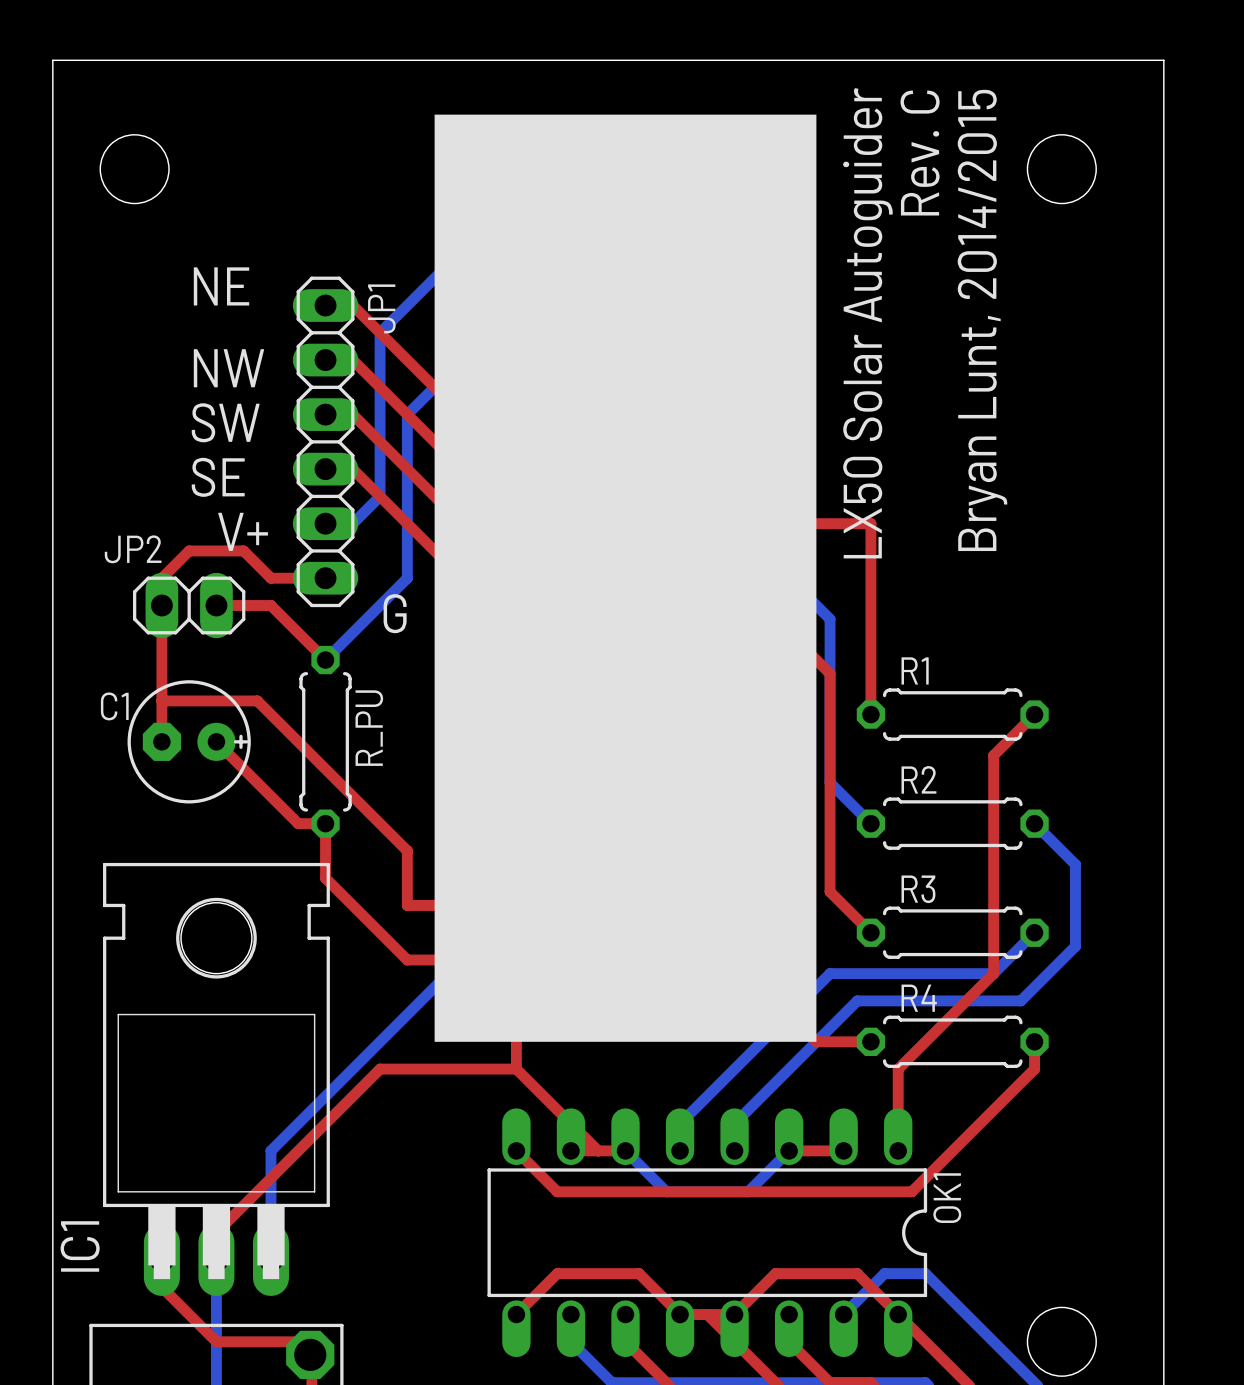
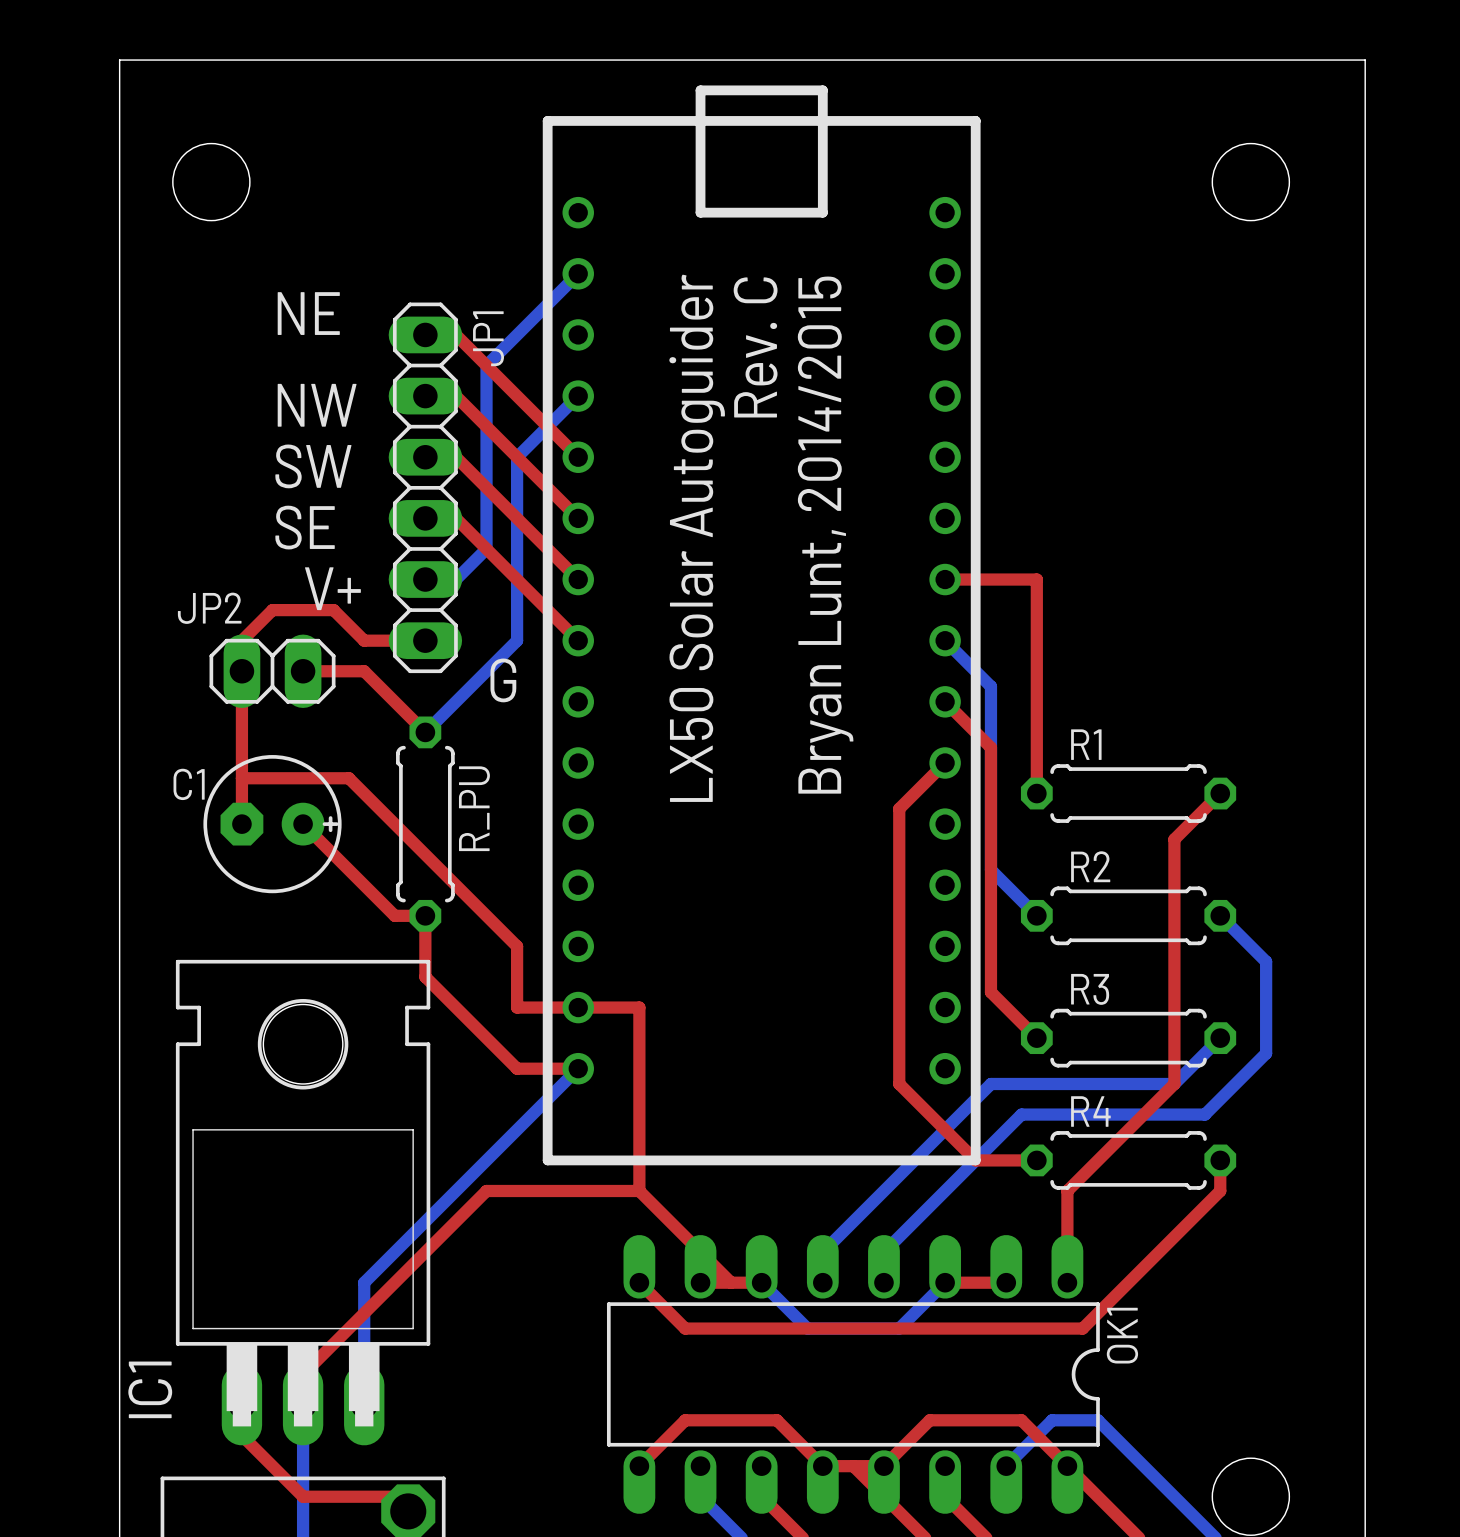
part footprint: [434, 114, 817, 1042] -> [542, 85, 981, 1166]
text position: Rev. C (920, 153) -> Rev. C (755, 347)
text position: Bryan Lunt, 2014/2015 (982, 320) -> Bryan Lunt, 2014/2015 (825, 535)
text position: LX50 Solar Autoguider (867, 323) -> LX50 Solar Autoguider (697, 538)

